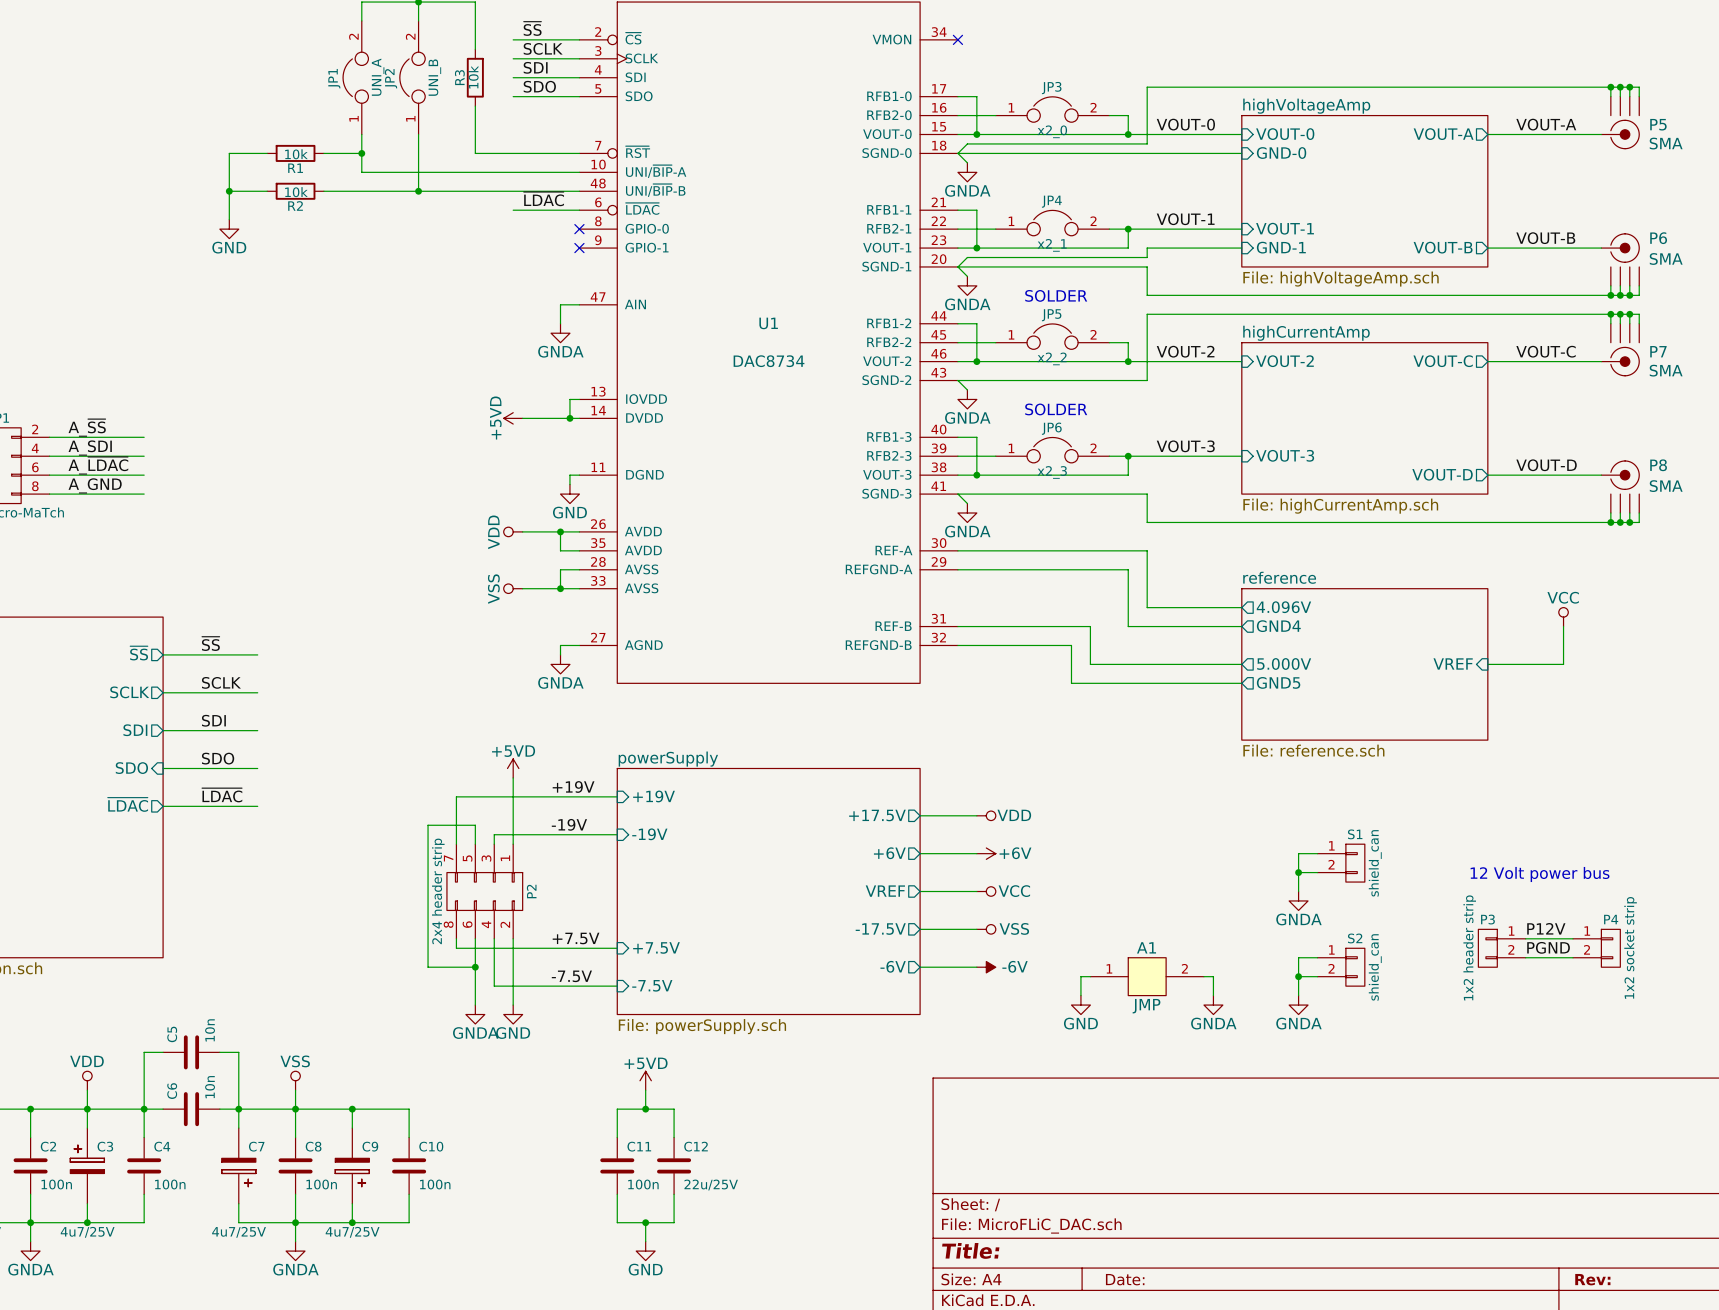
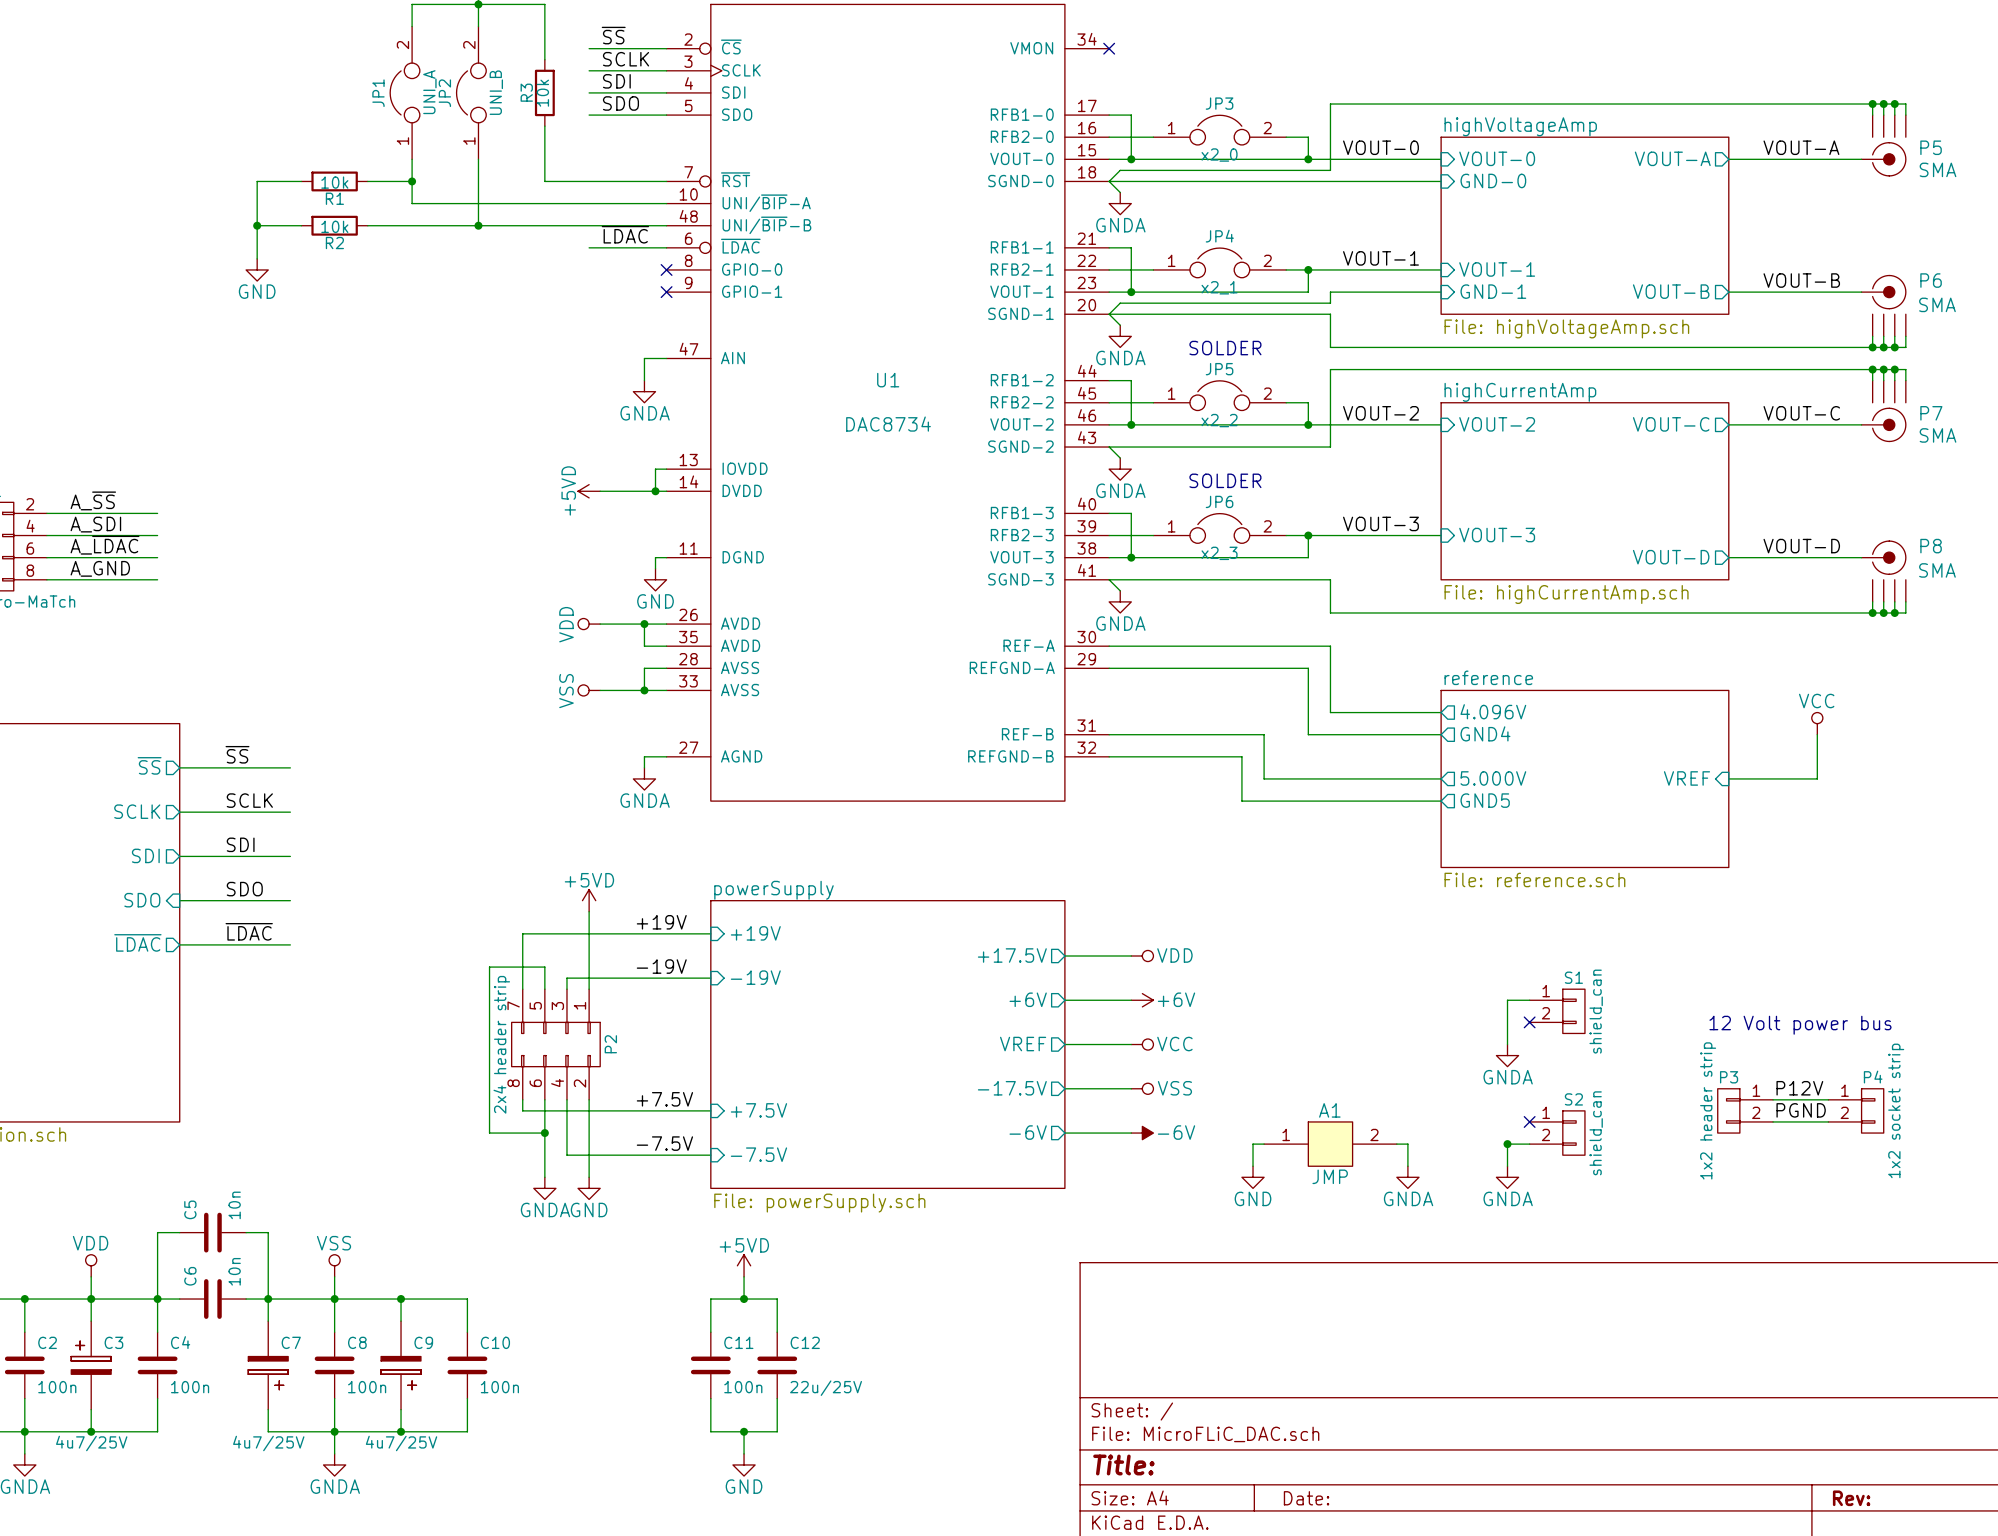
wire: (1298, 872) (1317, 872) -> none
junction: (1298, 872) -> none
no-connect mark: none -> (1529, 1022)
wire: (1317, 957) (1298, 957) (1298, 976) -> none
no-connect mark: none -> (1529, 1121)

